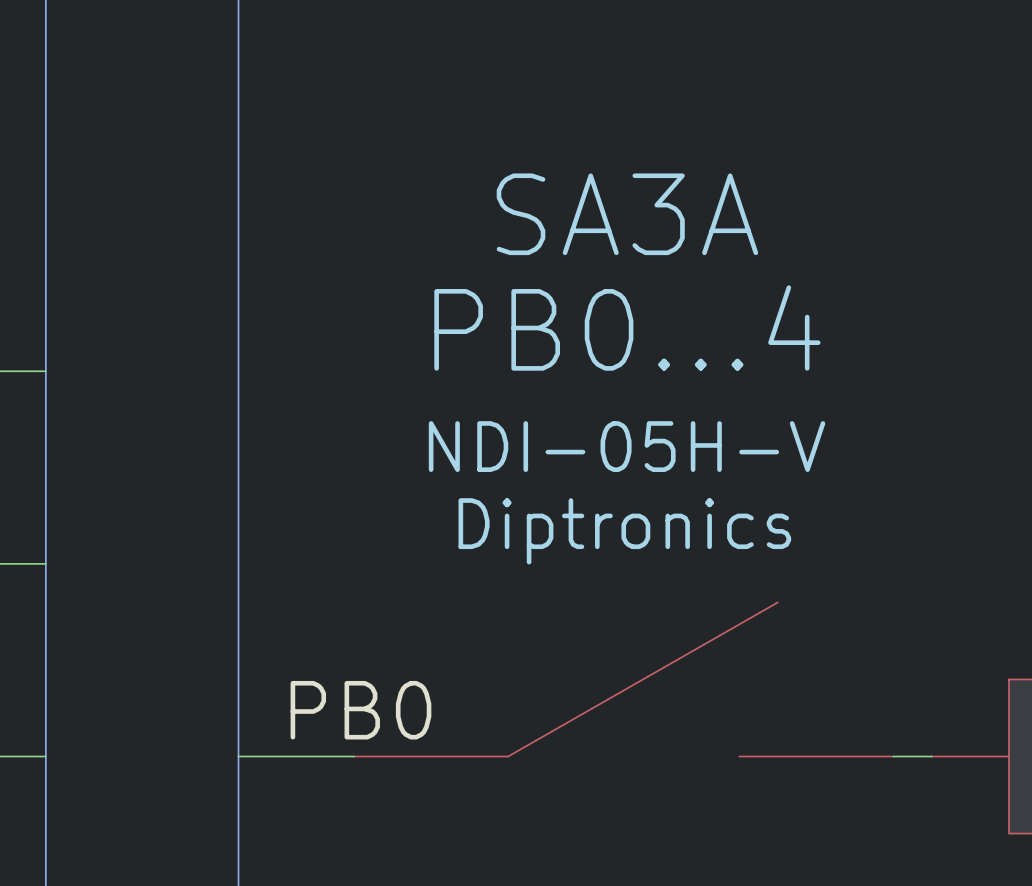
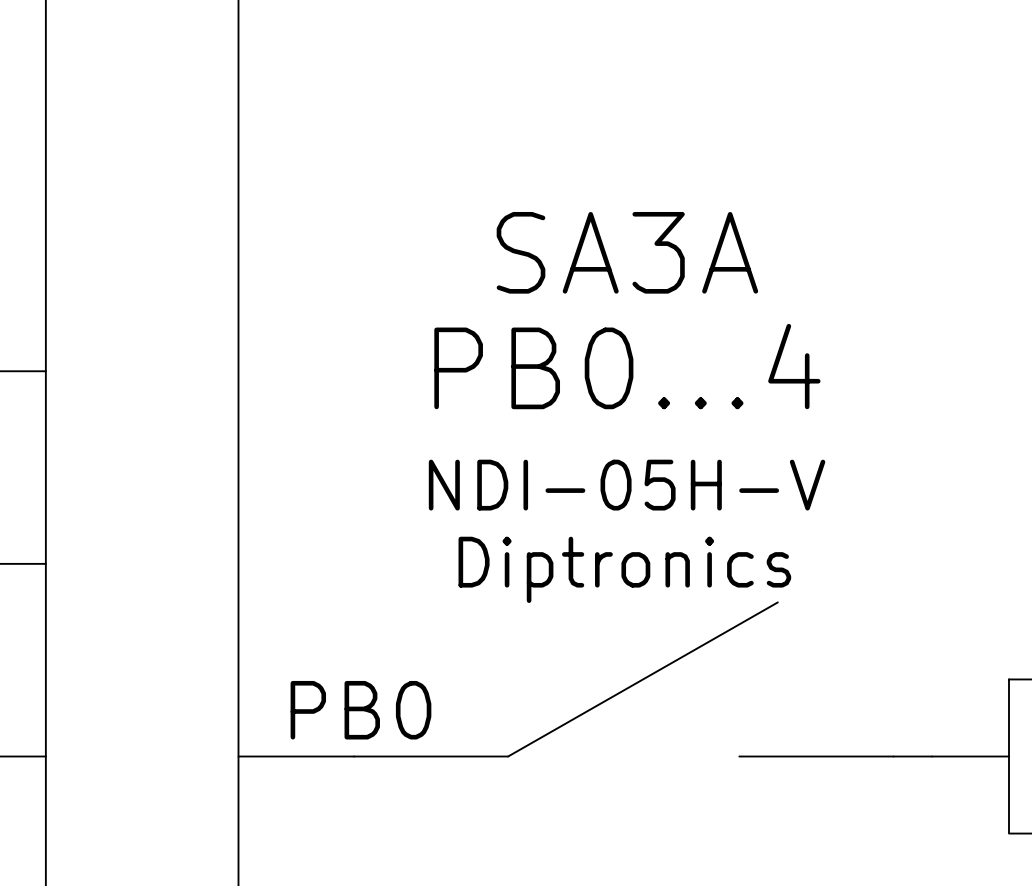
SA3A name position: SA3A (627, 214) -> SA3A (627, 252)
SA3A text position: PB0...4 (627, 328) -> PB0...4 (627, 366)
SA3A text position: NDI-05H-V (627, 446) -> NDI-05H-V (627, 485)
SA3A text position: Diptronics (624, 531) -> Diptronics (624, 569)

